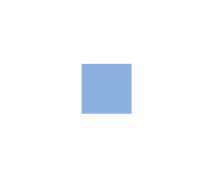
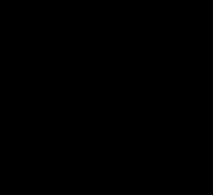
part: (106, 88) -> none

